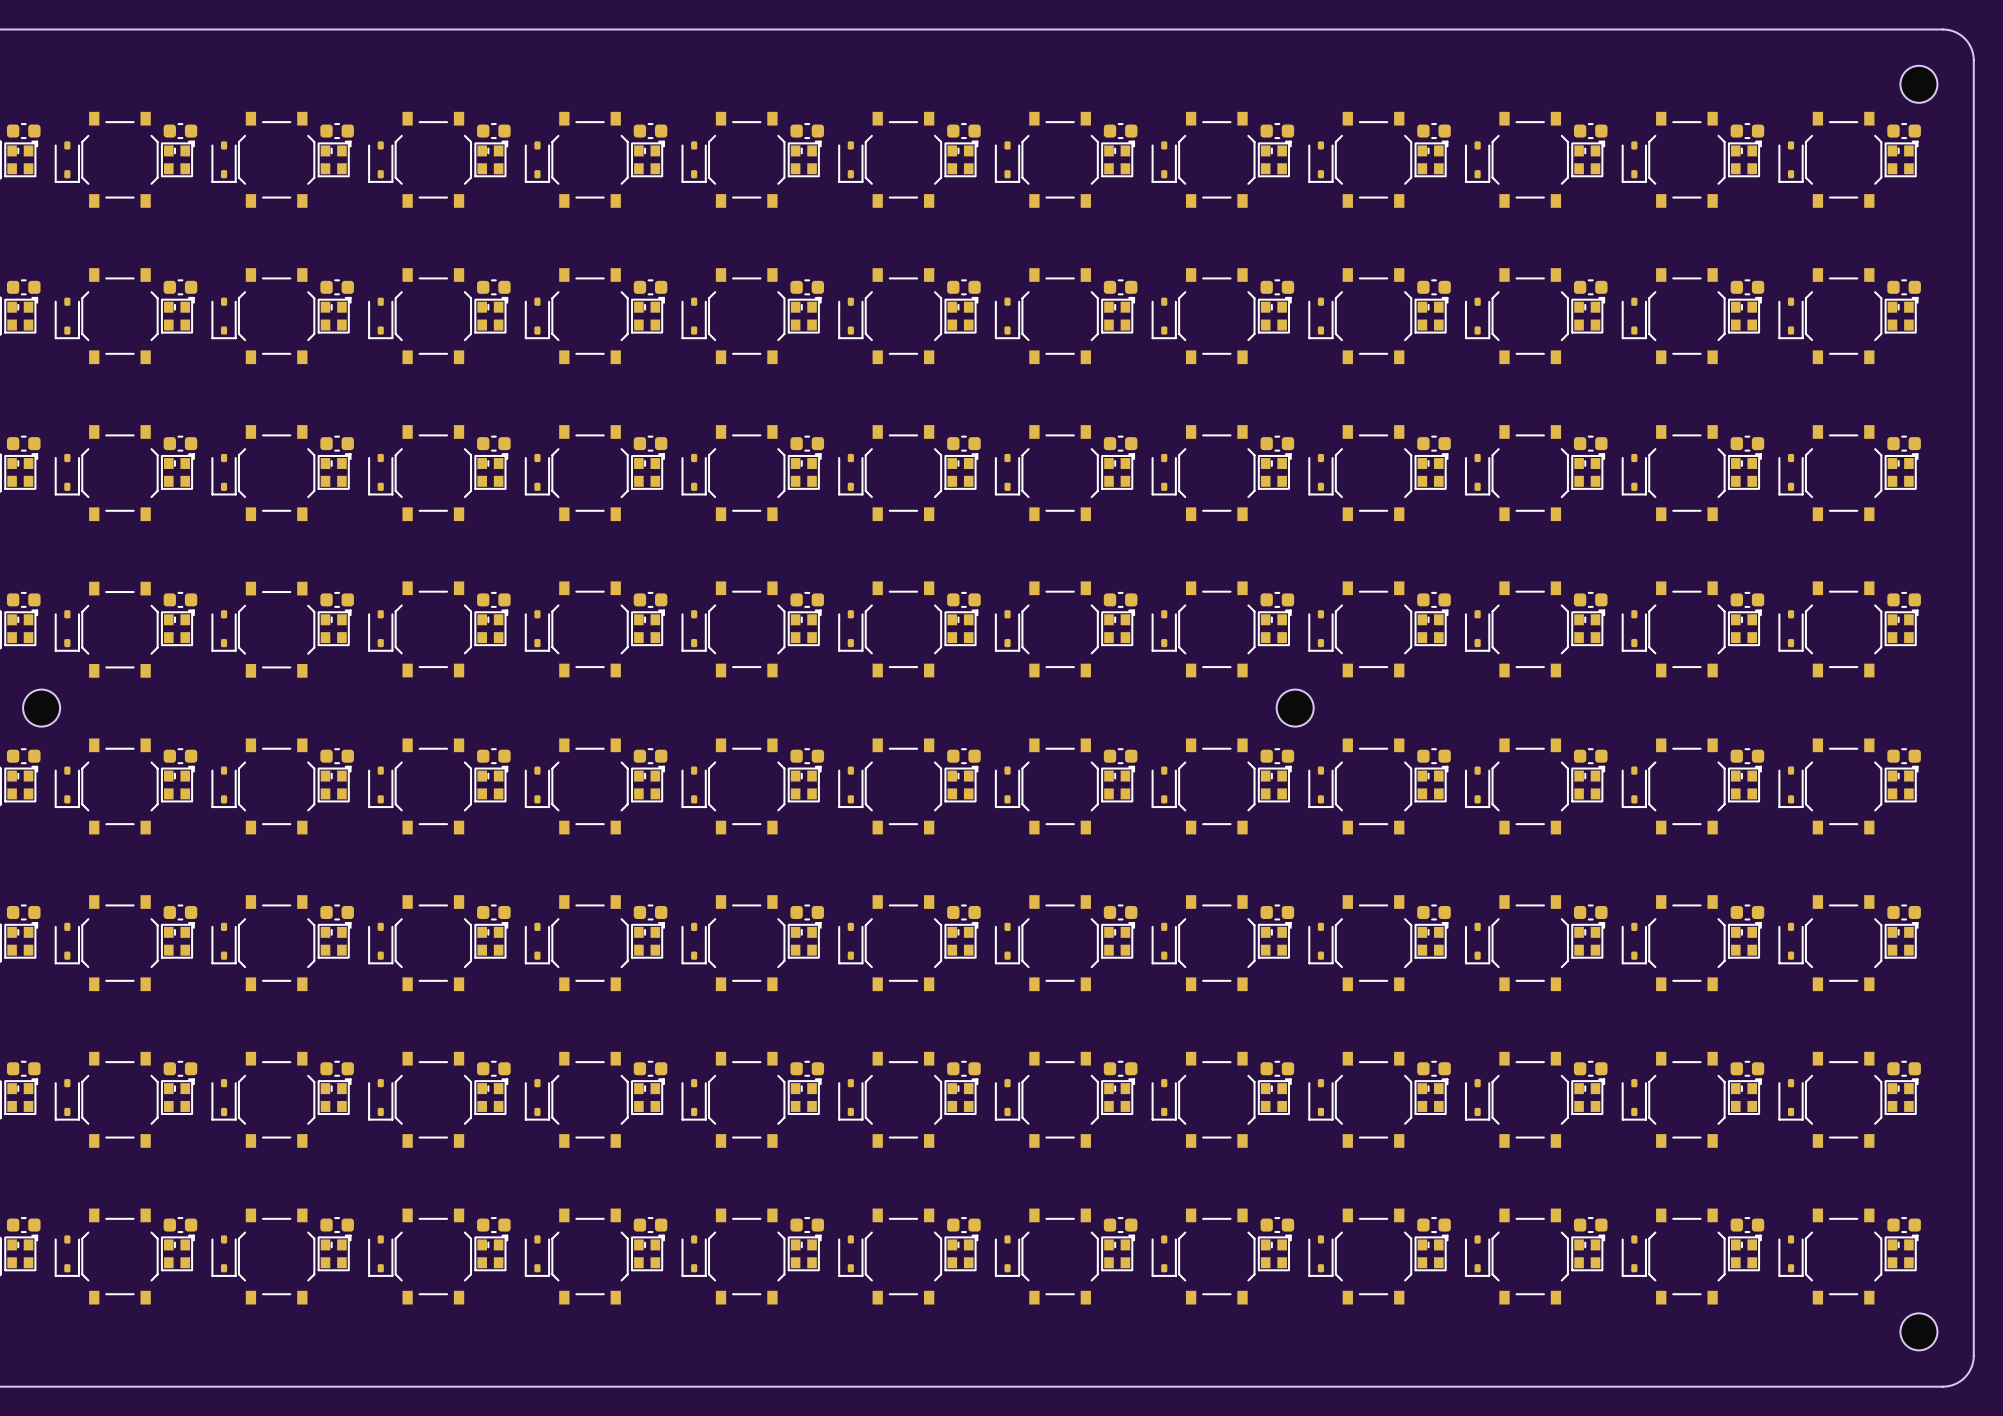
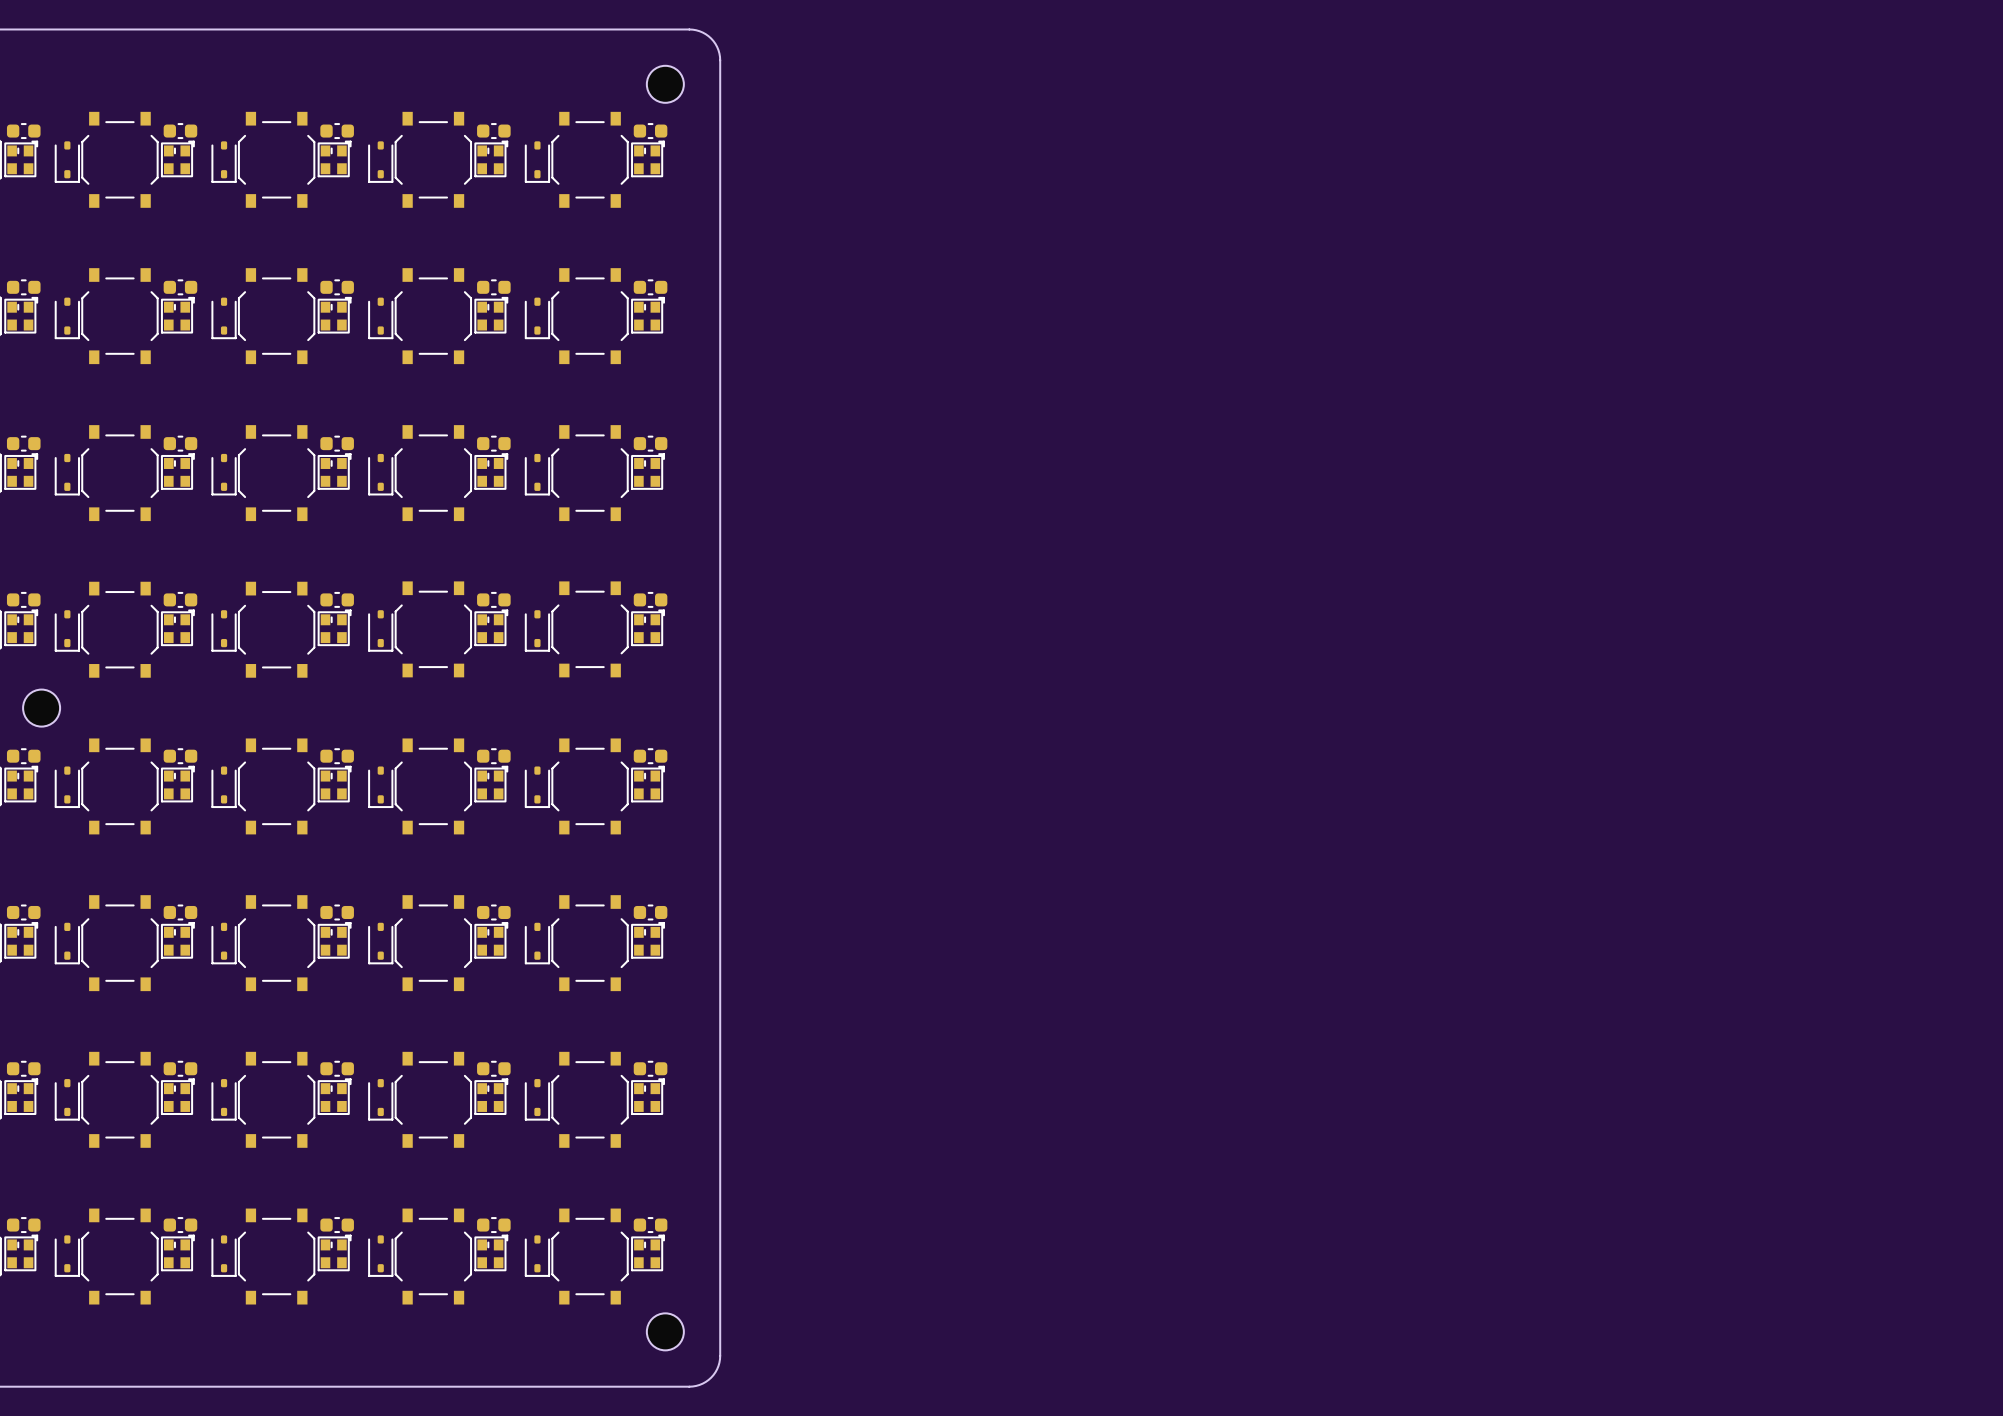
board edge: (689, 29) (1942, 29) (1953, 31) (1964, 38) (1970, 46) (1973, 60) (1973, 1355) (1972, 1366) (1964, 1377) (1956, 1383) (1942, 1386) (689, 1386) -> (689, 29) (702, 32) (711, 38) (718, 50) (720, 60) (720, 1355) (718, 1366) (711, 1377) (702, 1383) (689, 1386)
part: none -> (665, 84)
part: (1918, 84) -> none
part: (807, 131) -> none
part: (963, 131) -> none
part: (1120, 131) -> none
part: (1277, 131) -> none
part: (1434, 131) -> none
part: (1590, 131) -> none
part: (1747, 131) -> none
part: (1904, 131) -> none
part: (804, 158) -> none
part: (961, 158) -> none
part: (1118, 158) -> none
part: (1274, 158) -> none
part: (1431, 158) -> none
part: (1588, 158) -> none
part: (1744, 158) -> none
part: (1901, 158) -> none
part: (746, 159) -> none
part: (903, 159) -> none
part: (1060, 159) -> none
part: (1216, 159) -> none
part: (1373, 159) -> none
part: (1530, 159) -> none
part: (1686, 159) -> none
part: (1843, 159) -> none
part: (694, 162) -> none
part: (850, 162) -> none
part: (1007, 162) -> none
part: (1164, 162) -> none
part: (1320, 162) -> none
part: (1477, 162) -> none
part: (1634, 162) -> none
part: (1791, 162) -> none
part: (807, 287) -> none
part: (963, 287) -> none
part: (1120, 287) -> none
part: (1277, 287) -> none
part: (1434, 287) -> none
part: (1590, 287) -> none
part: (1747, 287) -> none
part: (1904, 287) -> none
part: (804, 315) -> none
part: (961, 315) -> none
part: (1118, 315) -> none
part: (1274, 315) -> none
part: (1431, 315) -> none
part: (1588, 315) -> none
part: (1744, 315) -> none
part: (1901, 315) -> none
part: (746, 316) -> none
part: (903, 316) -> none
part: (1060, 316) -> none
part: (1216, 316) -> none
part: (1373, 316) -> none
part: (1530, 316) -> none
part: (1686, 316) -> none
part: (1843, 316) -> none
part: (694, 318) -> none
part: (850, 318) -> none
part: (1007, 318) -> none
part: (1164, 318) -> none
part: (1320, 318) -> none
part: (1477, 318) -> none
part: (1634, 318) -> none
part: (1791, 318) -> none
part: (807, 443) -> none
part: (963, 443) -> none
part: (1120, 443) -> none
part: (1277, 443) -> none
part: (1434, 443) -> none
part: (1590, 443) -> none
part: (1747, 443) -> none
part: (1904, 443) -> none
part: (804, 471) -> none
part: (961, 471) -> none
part: (1118, 471) -> none
part: (1274, 471) -> none
part: (1431, 471) -> none
part: (1588, 471) -> none
part: (1744, 471) -> none
part: (1901, 471) -> none
part: (746, 473) -> none
part: (903, 473) -> none
part: (1060, 473) -> none
part: (1216, 473) -> none
part: (1373, 473) -> none
part: (1530, 473) -> none
part: (1686, 473) -> none
part: (1843, 473) -> none
part: (694, 474) -> none
part: (850, 474) -> none
part: (1007, 474) -> none
part: (1164, 474) -> none
part: (1320, 474) -> none
part: (1477, 474) -> none
part: (1634, 474) -> none
part: (1791, 474) -> none
part: (807, 599) -> none
part: (963, 599) -> none
part: (1120, 599) -> none
part: (1277, 599) -> none
part: (1434, 599) -> none
part: (1590, 599) -> none
part: (1747, 599) -> none
part: (1904, 599) -> none
part: (804, 627) -> none
part: (961, 627) -> none
part: (1118, 627) -> none
part: (1274, 627) -> none
part: (1431, 627) -> none
part: (1588, 627) -> none
part: (1744, 627) -> none
part: (1901, 627) -> none
part: (746, 629) -> none
part: (903, 629) -> none
part: (1060, 629) -> none
part: (1216, 629) -> none
part: (1373, 629) -> none
part: (1530, 629) -> none
part: (1686, 629) -> none
part: (1843, 629) -> none
part: (694, 630) -> none
part: (850, 630) -> none
part: (1007, 630) -> none
part: (1164, 630) -> none
part: (1320, 630) -> none
part: (1477, 630) -> none
part: (1634, 630) -> none
part: (1791, 630) -> none
part: (1295, 708) -> none
part: (807, 756) -> none
part: (963, 756) -> none
part: (1120, 756) -> none
part: (1277, 756) -> none
part: (1434, 756) -> none
part: (1590, 756) -> none
part: (1747, 756) -> none
part: (1904, 756) -> none
part: (804, 784) -> none
part: (961, 784) -> none
part: (1118, 784) -> none
part: (1274, 784) -> none
part: (1431, 784) -> none
part: (1588, 784) -> none
part: (1744, 784) -> none
part: (1901, 784) -> none
part: (746, 786) -> none
part: (903, 786) -> none
part: (1060, 786) -> none
part: (1216, 786) -> none
part: (1373, 786) -> none
part: (1530, 786) -> none
part: (1686, 786) -> none
part: (1843, 786) -> none
part: (694, 787) -> none
part: (850, 787) -> none
part: (1007, 787) -> none
part: (1164, 787) -> none
part: (1320, 787) -> none
part: (1477, 787) -> none
part: (1634, 787) -> none
part: (1791, 787) -> none
part: (807, 912) -> none
part: (963, 912) -> none
part: (1120, 912) -> none
part: (1277, 912) -> none
part: (1434, 912) -> none
part: (1590, 912) -> none
part: (1747, 912) -> none
part: (1904, 912) -> none
part: (804, 940) -> none
part: (961, 940) -> none
part: (1118, 940) -> none
part: (1274, 940) -> none
part: (1431, 940) -> none
part: (1588, 940) -> none
part: (1744, 940) -> none
part: (1901, 940) -> none
part: (694, 943) -> none
part: (746, 943) -> none
part: (850, 943) -> none
part: (903, 943) -> none
part: (1007, 943) -> none
part: (1060, 943) -> none
part: (1164, 943) -> none
part: (1216, 943) -> none
part: (1320, 943) -> none
part: (1373, 943) -> none
part: (1477, 943) -> none
part: (1530, 943) -> none
part: (1634, 943) -> none
part: (1686, 943) -> none
part: (1791, 943) -> none
part: (1843, 943) -> none
part: (807, 1068) -> none
part: (963, 1068) -> none
part: (1120, 1068) -> none
part: (1277, 1068) -> none
part: (1434, 1068) -> none
part: (1590, 1068) -> none
part: (1747, 1068) -> none
part: (1904, 1068) -> none
part: (804, 1096) -> none
part: (961, 1096) -> none
part: (1118, 1096) -> none
part: (1274, 1096) -> none
part: (1431, 1096) -> none
part: (1588, 1096) -> none
part: (1744, 1096) -> none
part: (1901, 1096) -> none
part: (694, 1099) -> none
part: (746, 1099) -> none
part: (850, 1099) -> none
part: (903, 1099) -> none
part: (1007, 1099) -> none
part: (1060, 1099) -> none
part: (1164, 1099) -> none
part: (1216, 1099) -> none
part: (1320, 1099) -> none
part: (1373, 1099) -> none
part: (1477, 1099) -> none
part: (1530, 1099) -> none
part: (1634, 1099) -> none
part: (1686, 1099) -> none
part: (1791, 1099) -> none
part: (1843, 1099) -> none
part: (807, 1225) -> none
part: (963, 1225) -> none
part: (1120, 1225) -> none
part: (1277, 1225) -> none
part: (1434, 1225) -> none
part: (1590, 1225) -> none
part: (1747, 1225) -> none
part: (1904, 1225) -> none
part: (804, 1252) -> none
part: (961, 1252) -> none
part: (1118, 1252) -> none
part: (1274, 1252) -> none
part: (1431, 1252) -> none
part: (1588, 1252) -> none
part: (1744, 1252) -> none
part: (1901, 1252) -> none
part: (694, 1256) -> none
part: (746, 1256) -> none
part: (850, 1256) -> none
part: (903, 1256) -> none
part: (1007, 1256) -> none
part: (1060, 1256) -> none
part: (1164, 1256) -> none
part: (1216, 1256) -> none
part: (1320, 1256) -> none
part: (1373, 1256) -> none
part: (1477, 1256) -> none
part: (1530, 1256) -> none
part: (1634, 1256) -> none
part: (1686, 1256) -> none
part: (1791, 1256) -> none
part: (1843, 1256) -> none
part: none -> (665, 1331)
part: (1918, 1331) -> none

